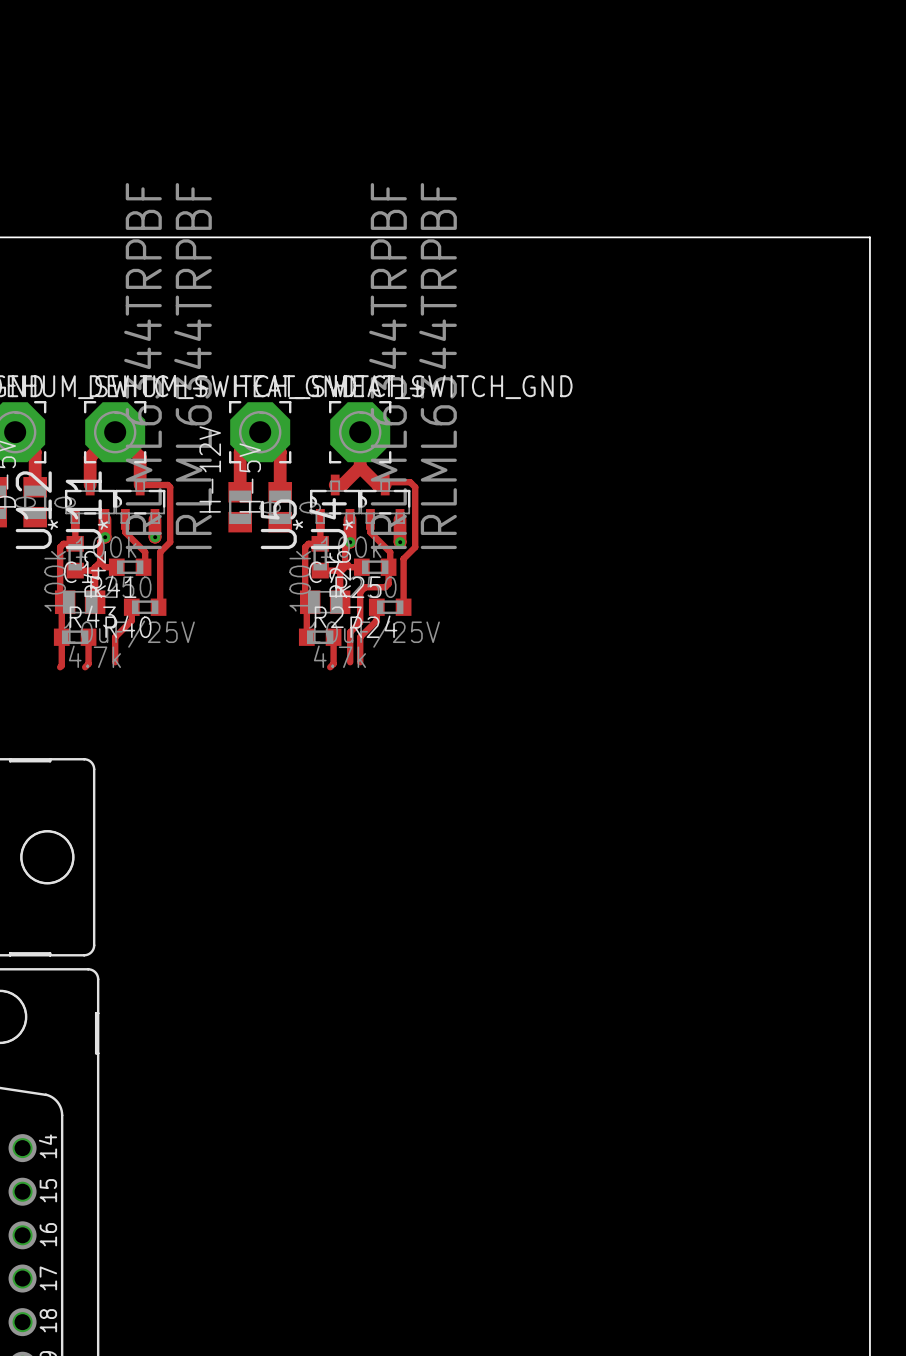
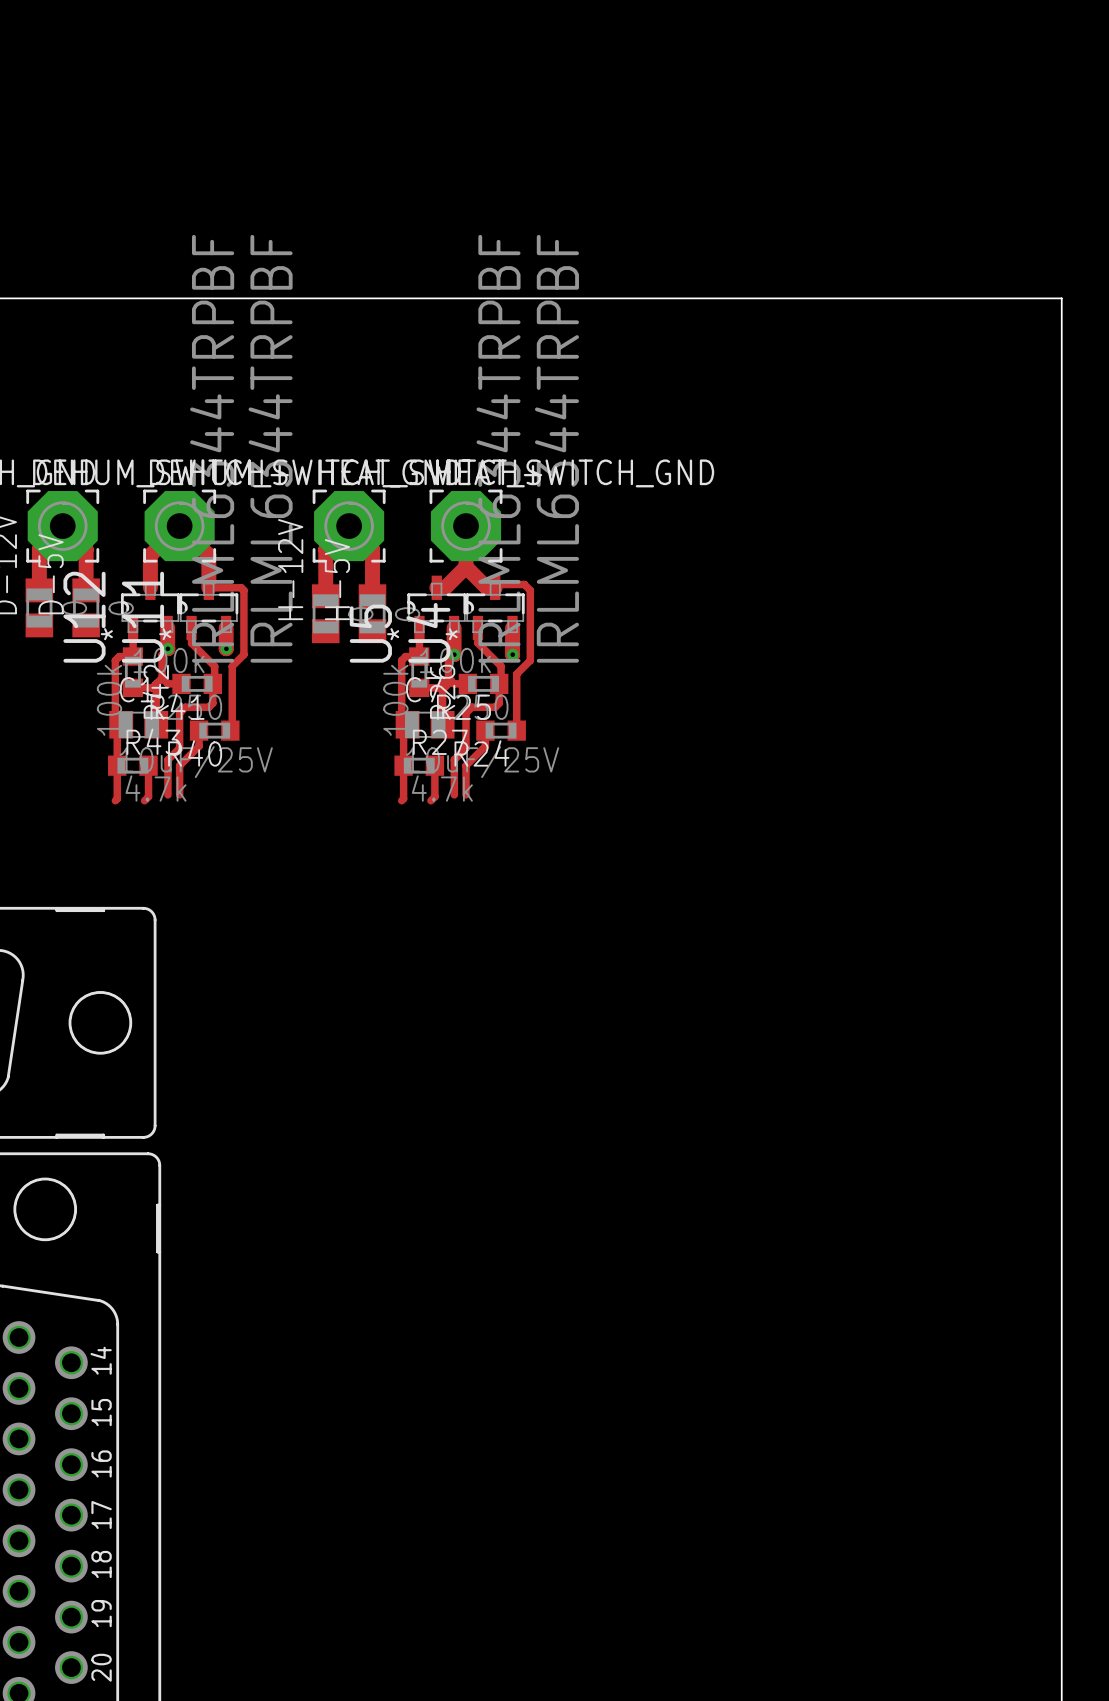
track: none -> (212, 683) (212, 703) (208, 707) (185, 707) (179, 713) (179, 748) (167, 759) (167, 794)
track: none -> (403, 765) (403, 798) (401, 800)

